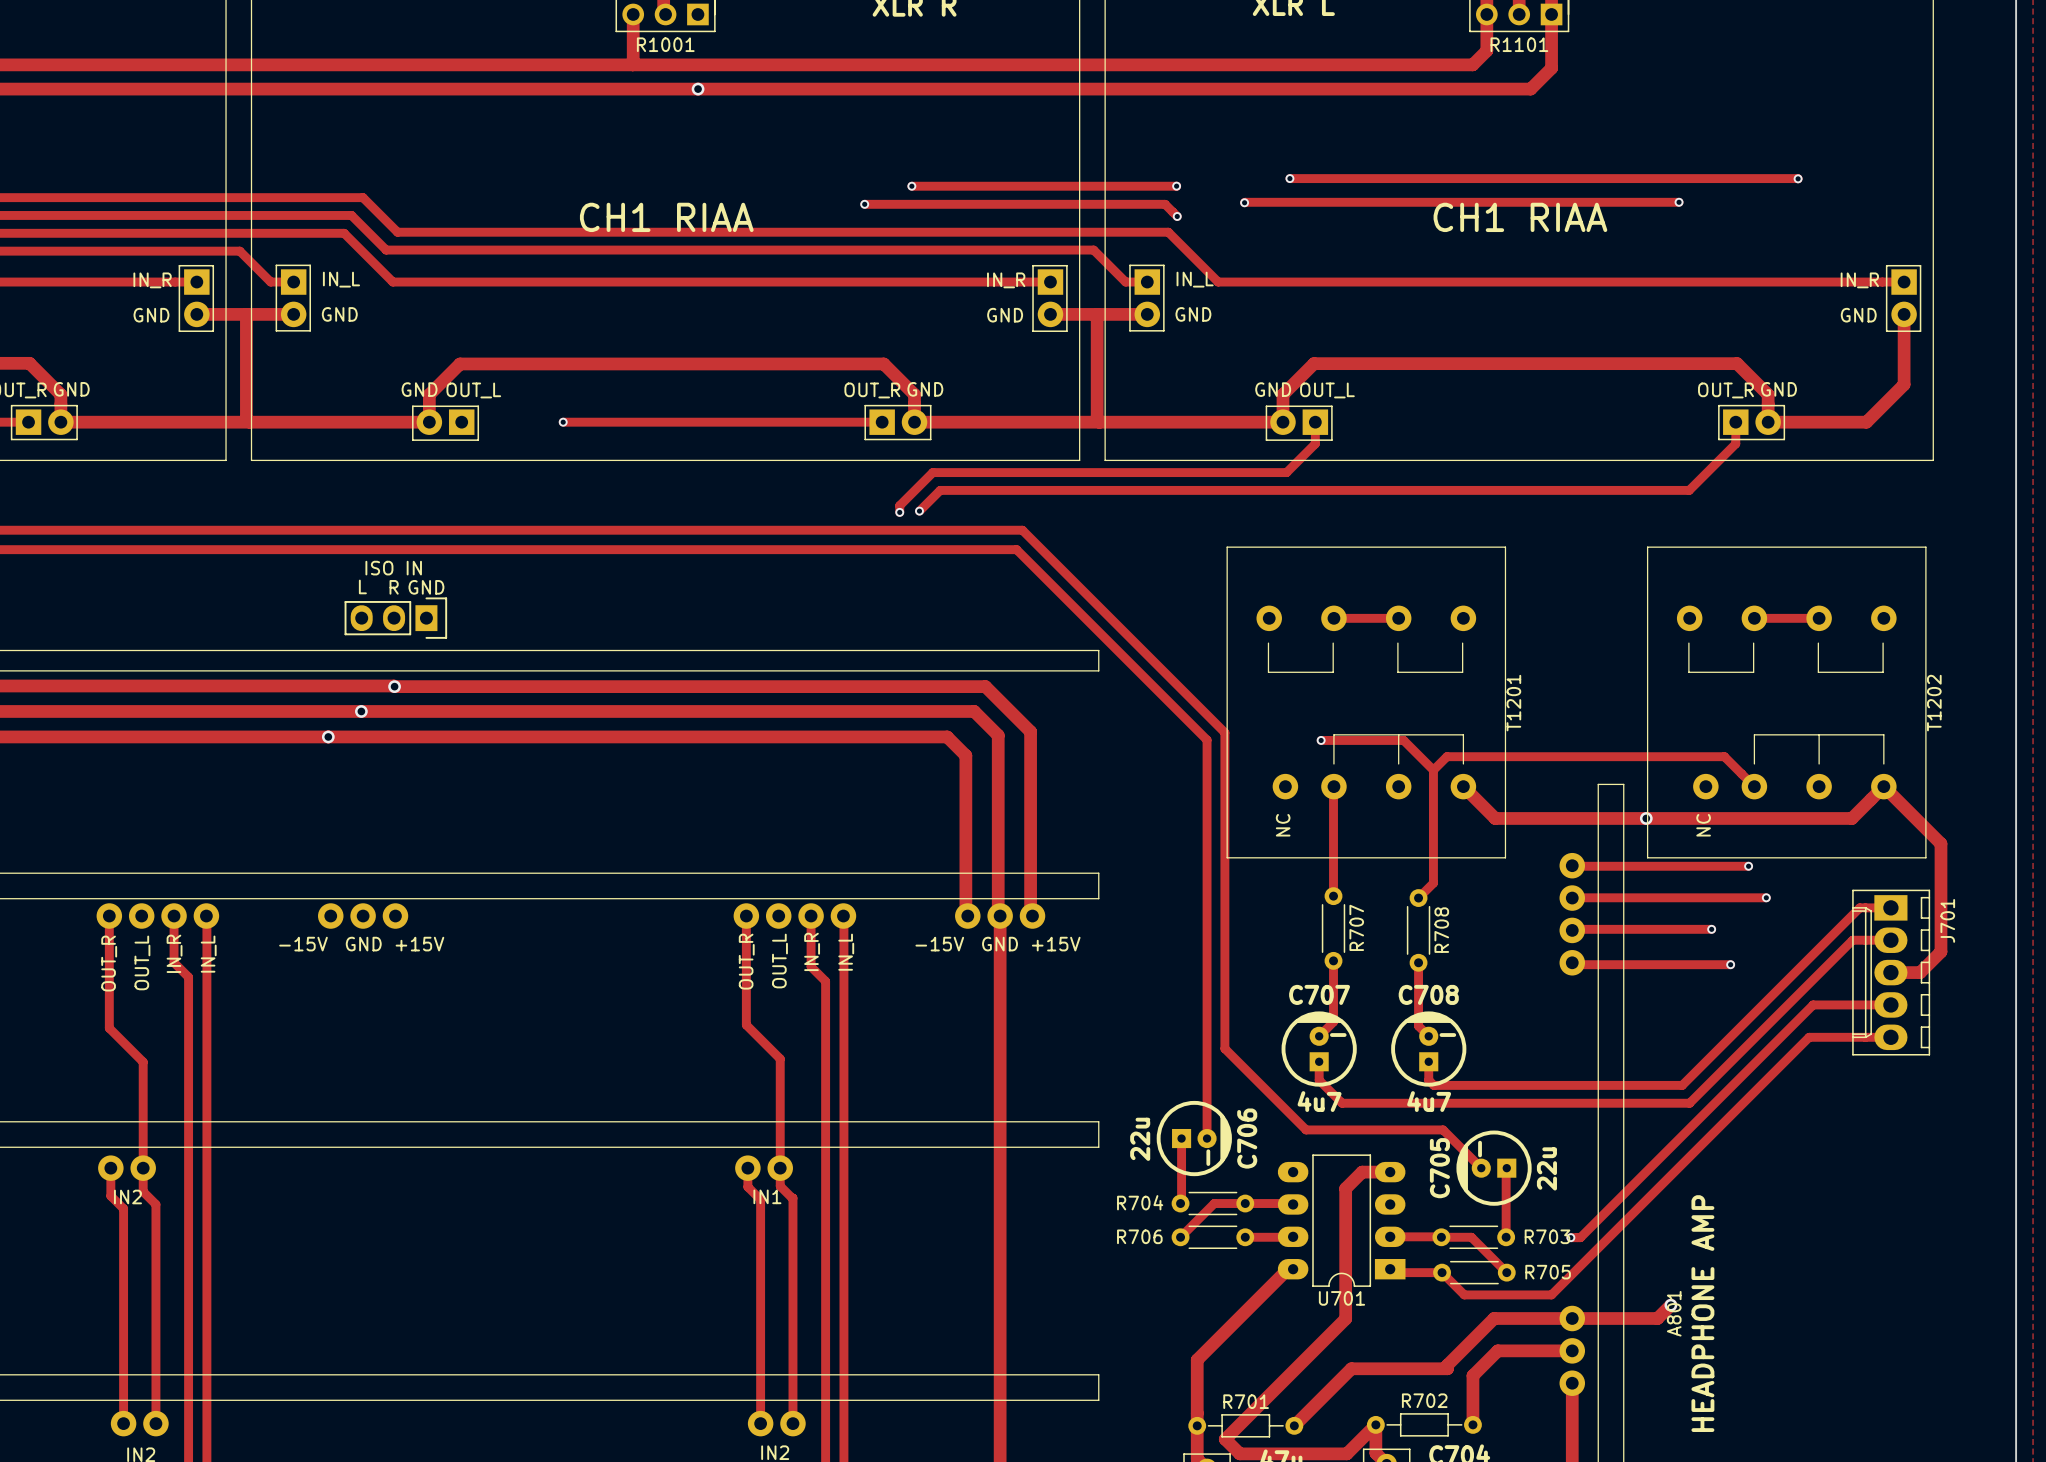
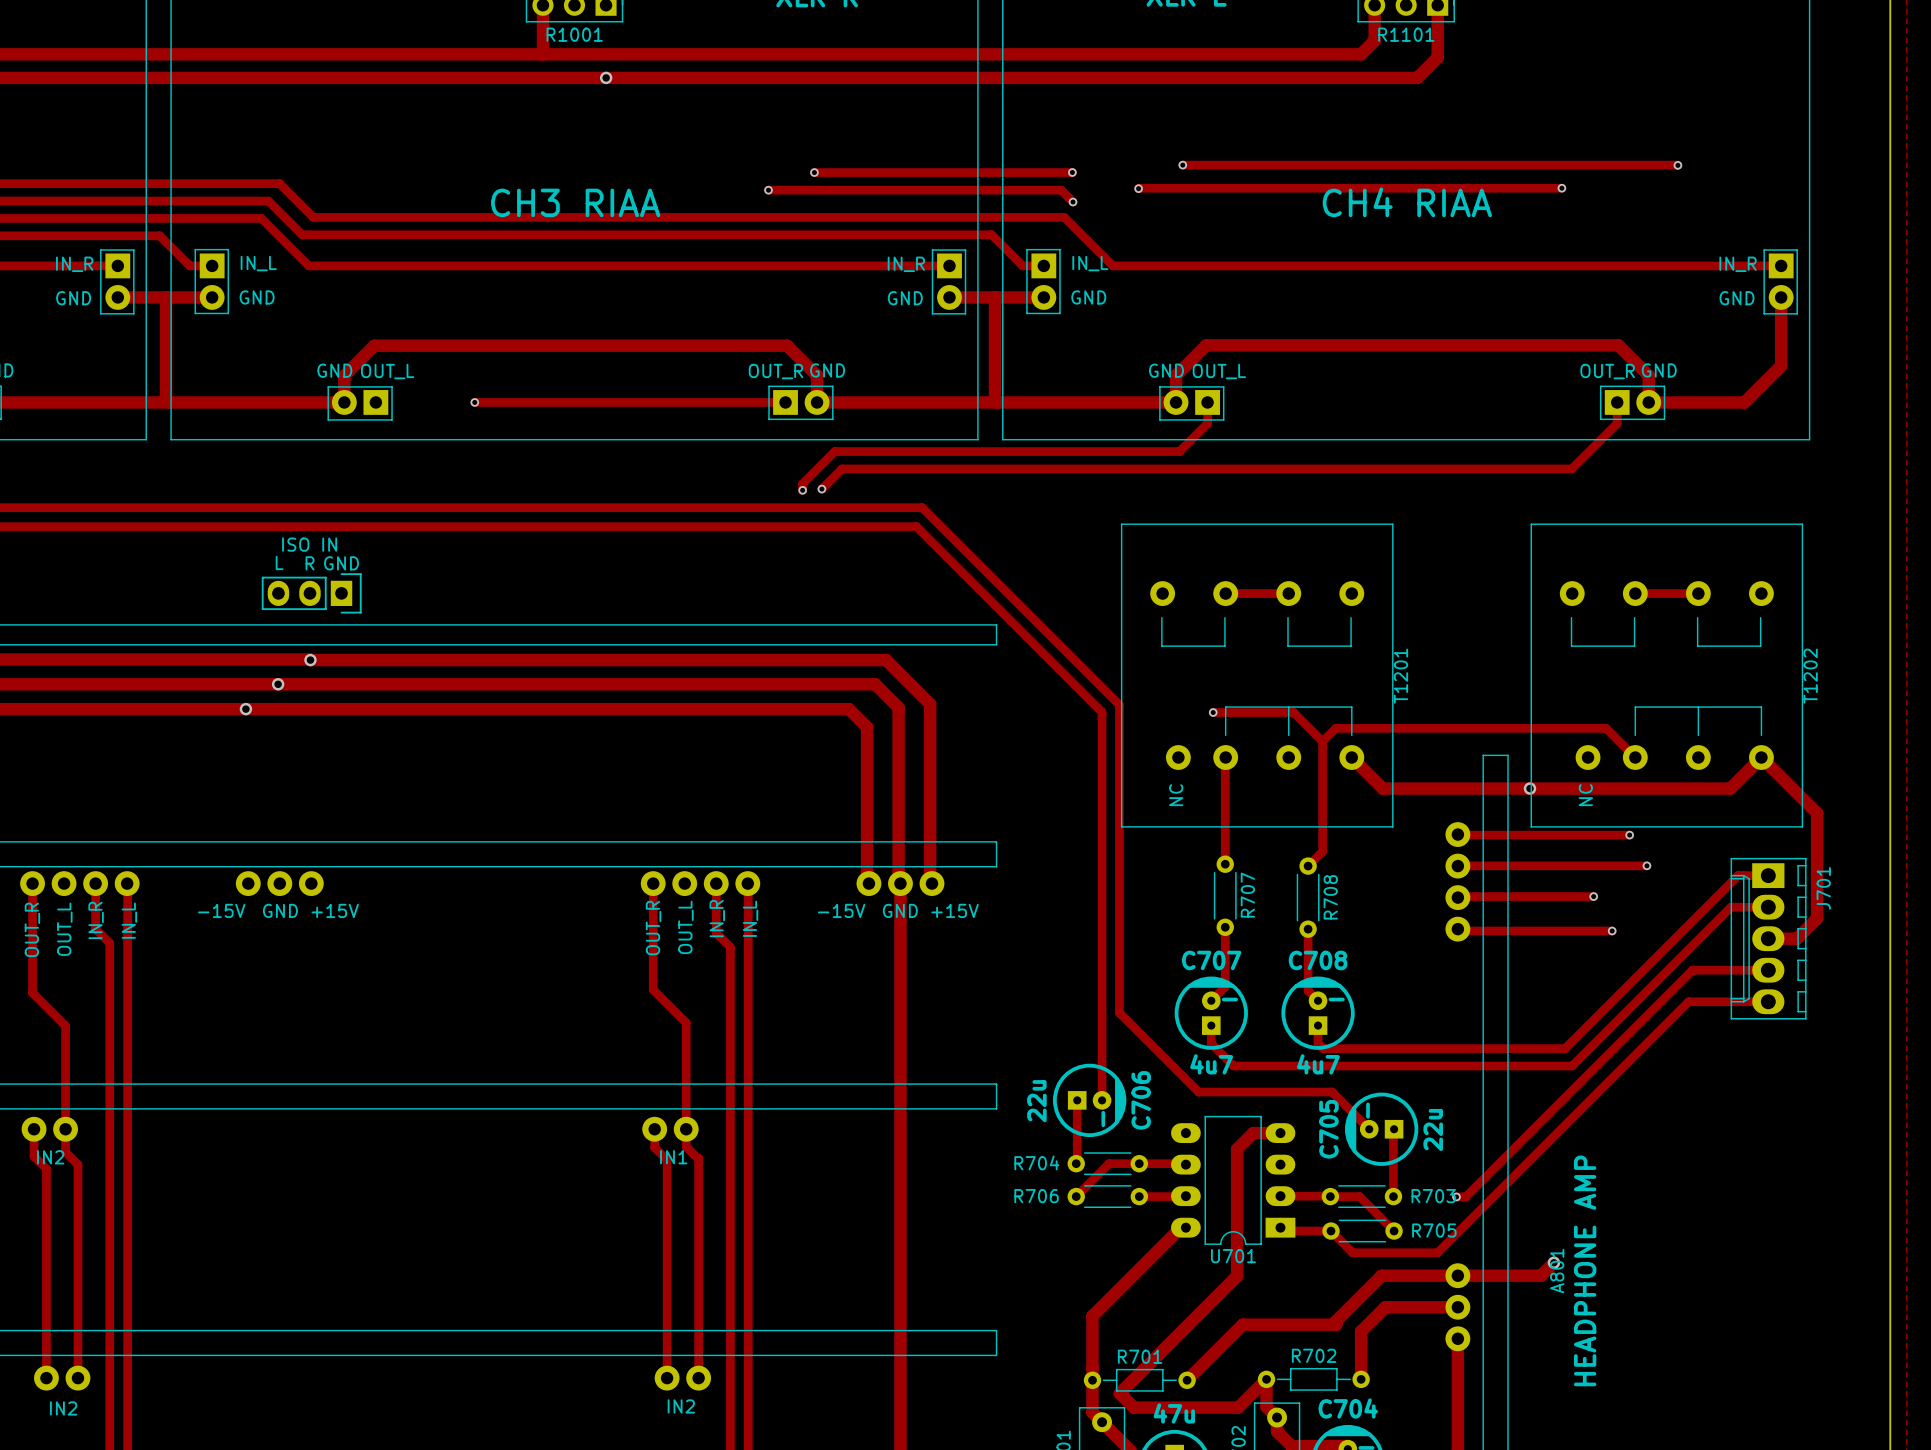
text: CH1 RIAA (666, 217) -> CH3 RIAA (575, 202)
text: CH1 RIAA (1520, 217) -> CH4 RIAA (1407, 202)

